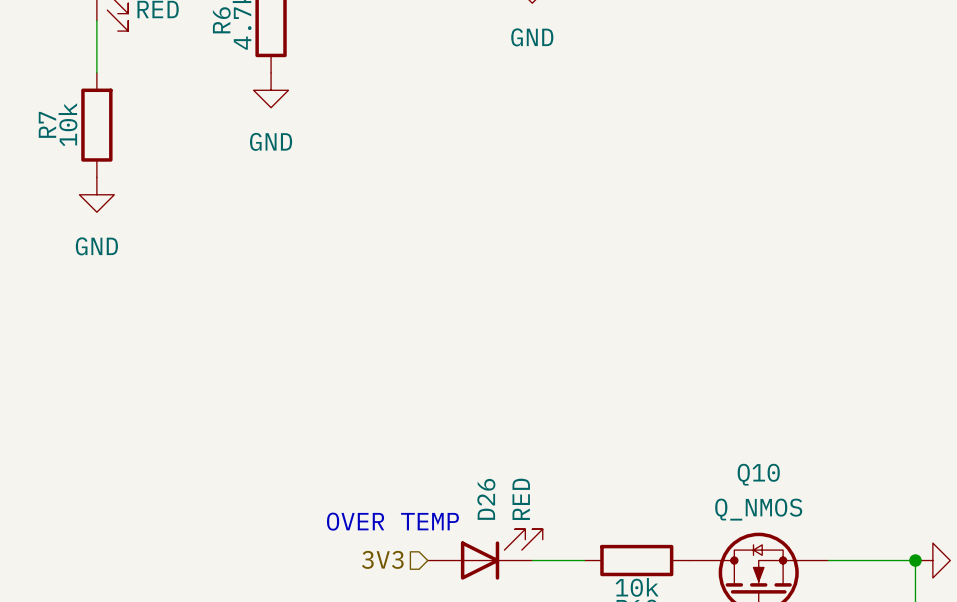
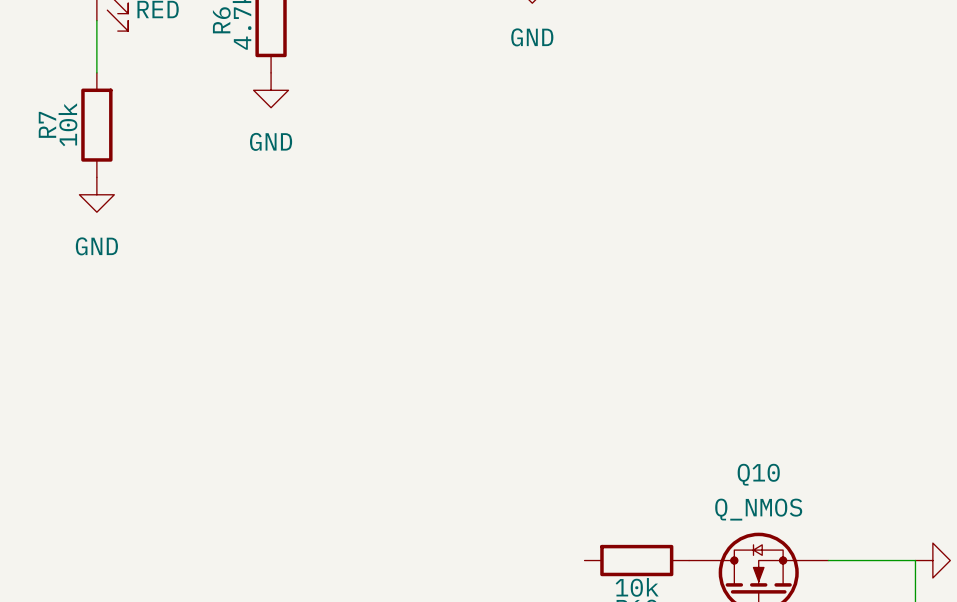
text: OVER TEMP (392, 521) -> none
D26: RED (485, 554) -> none
hierarchical label: 3V3 (382, 559) -> none
wire: (532, 560) (584, 560) -> none
junction: (915, 560) -> none

